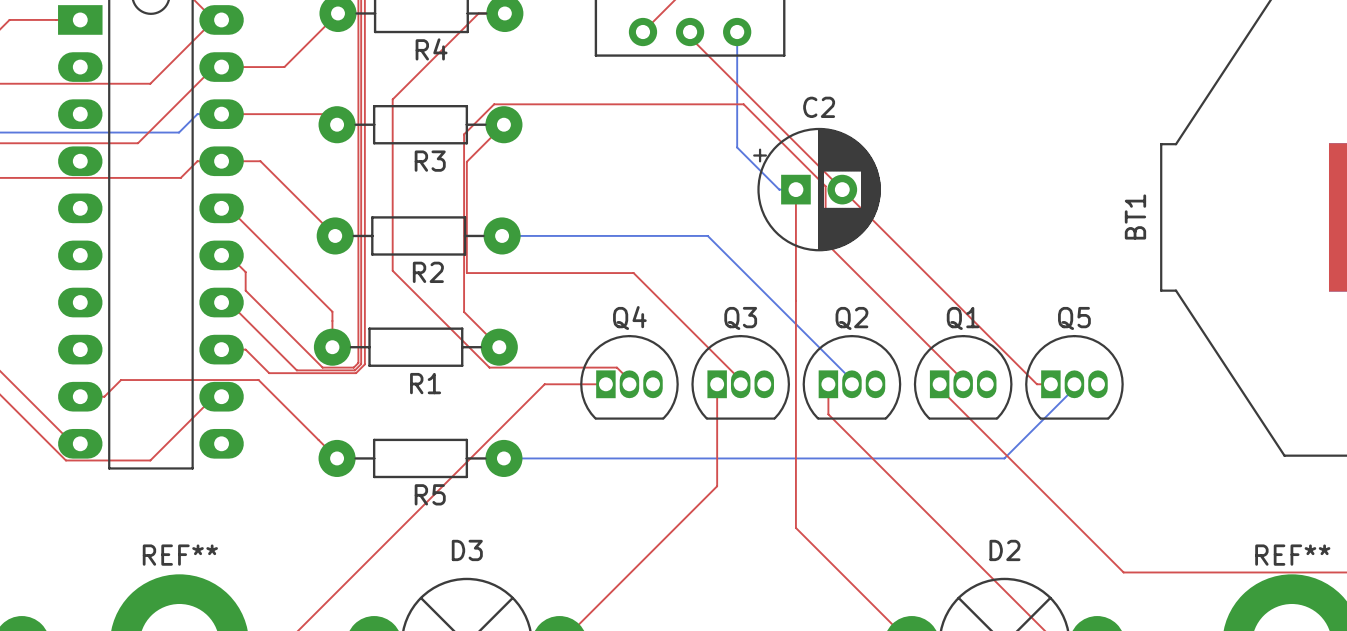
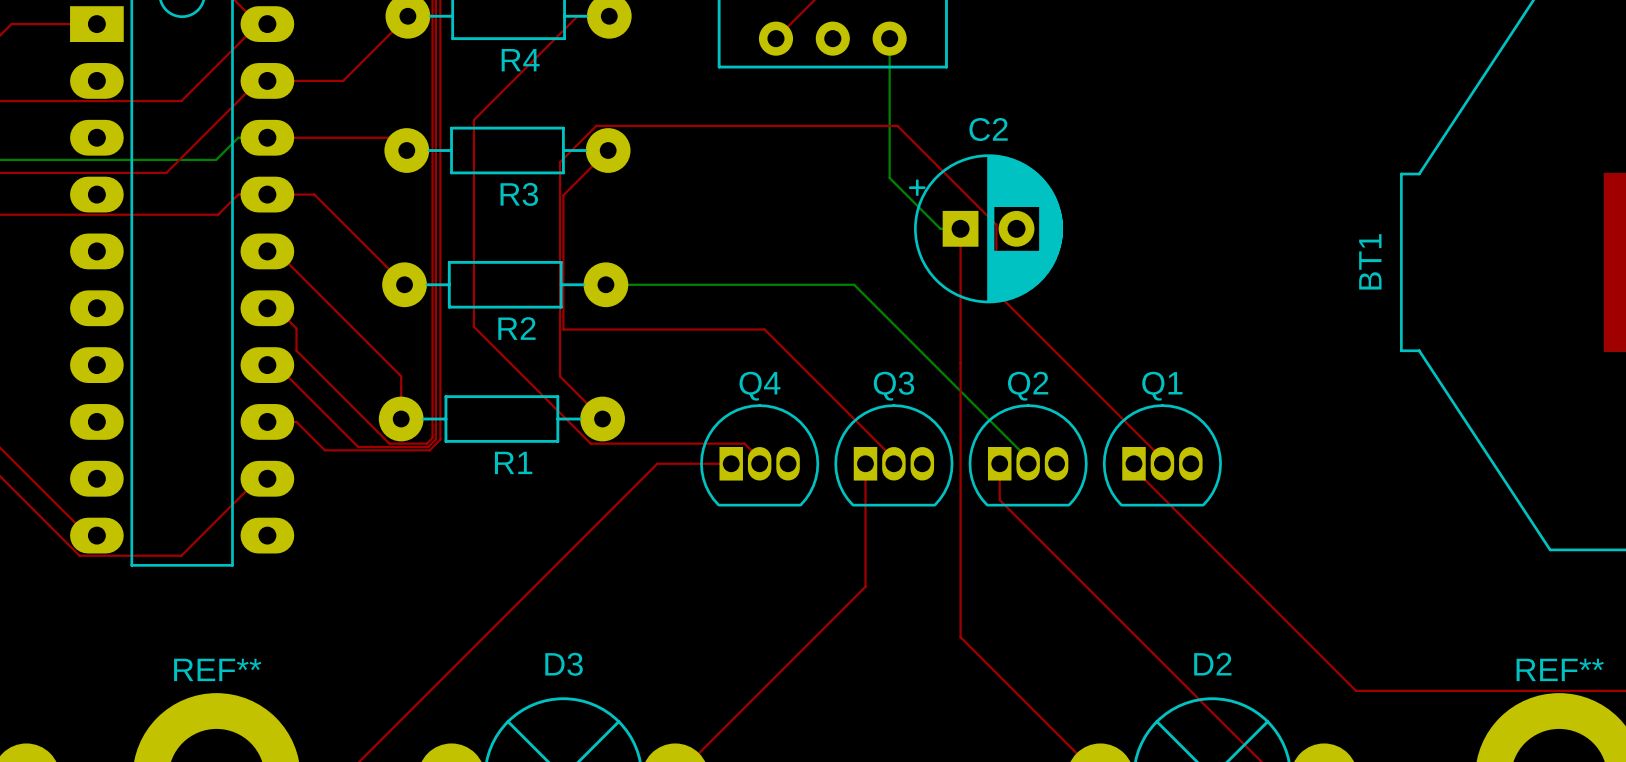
top track: (690, 32) (690, 37) (1036, 384) (1050, 384) -> none
Q5: (1074, 377) -> none
bottom track: (1074, 384) (1074, 388) (1004, 458) (503, 458) -> none
top track: (80, 396) (104, 396) (121, 380) (258, 380) (337, 458) -> none
R5: (420, 458) -> none

